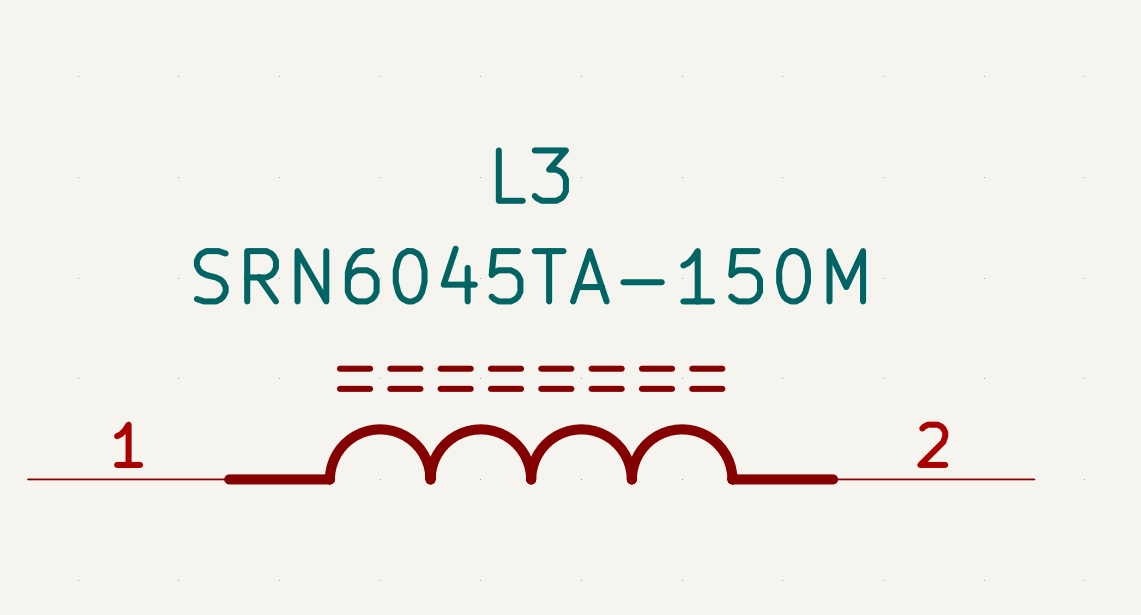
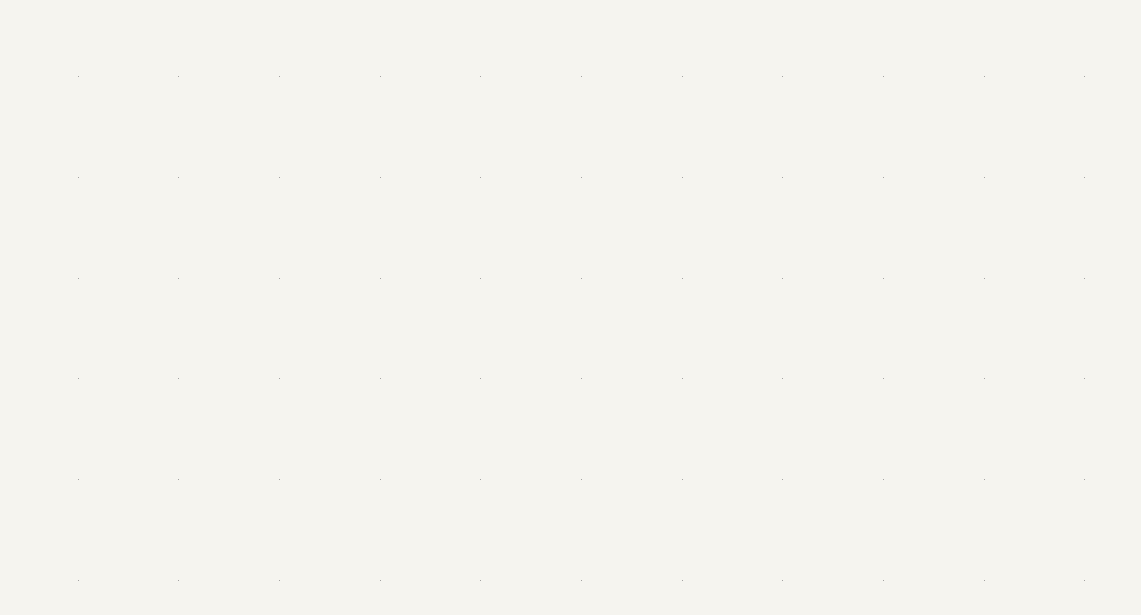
L3: SRN6045TA-150M (531, 425) -> none

